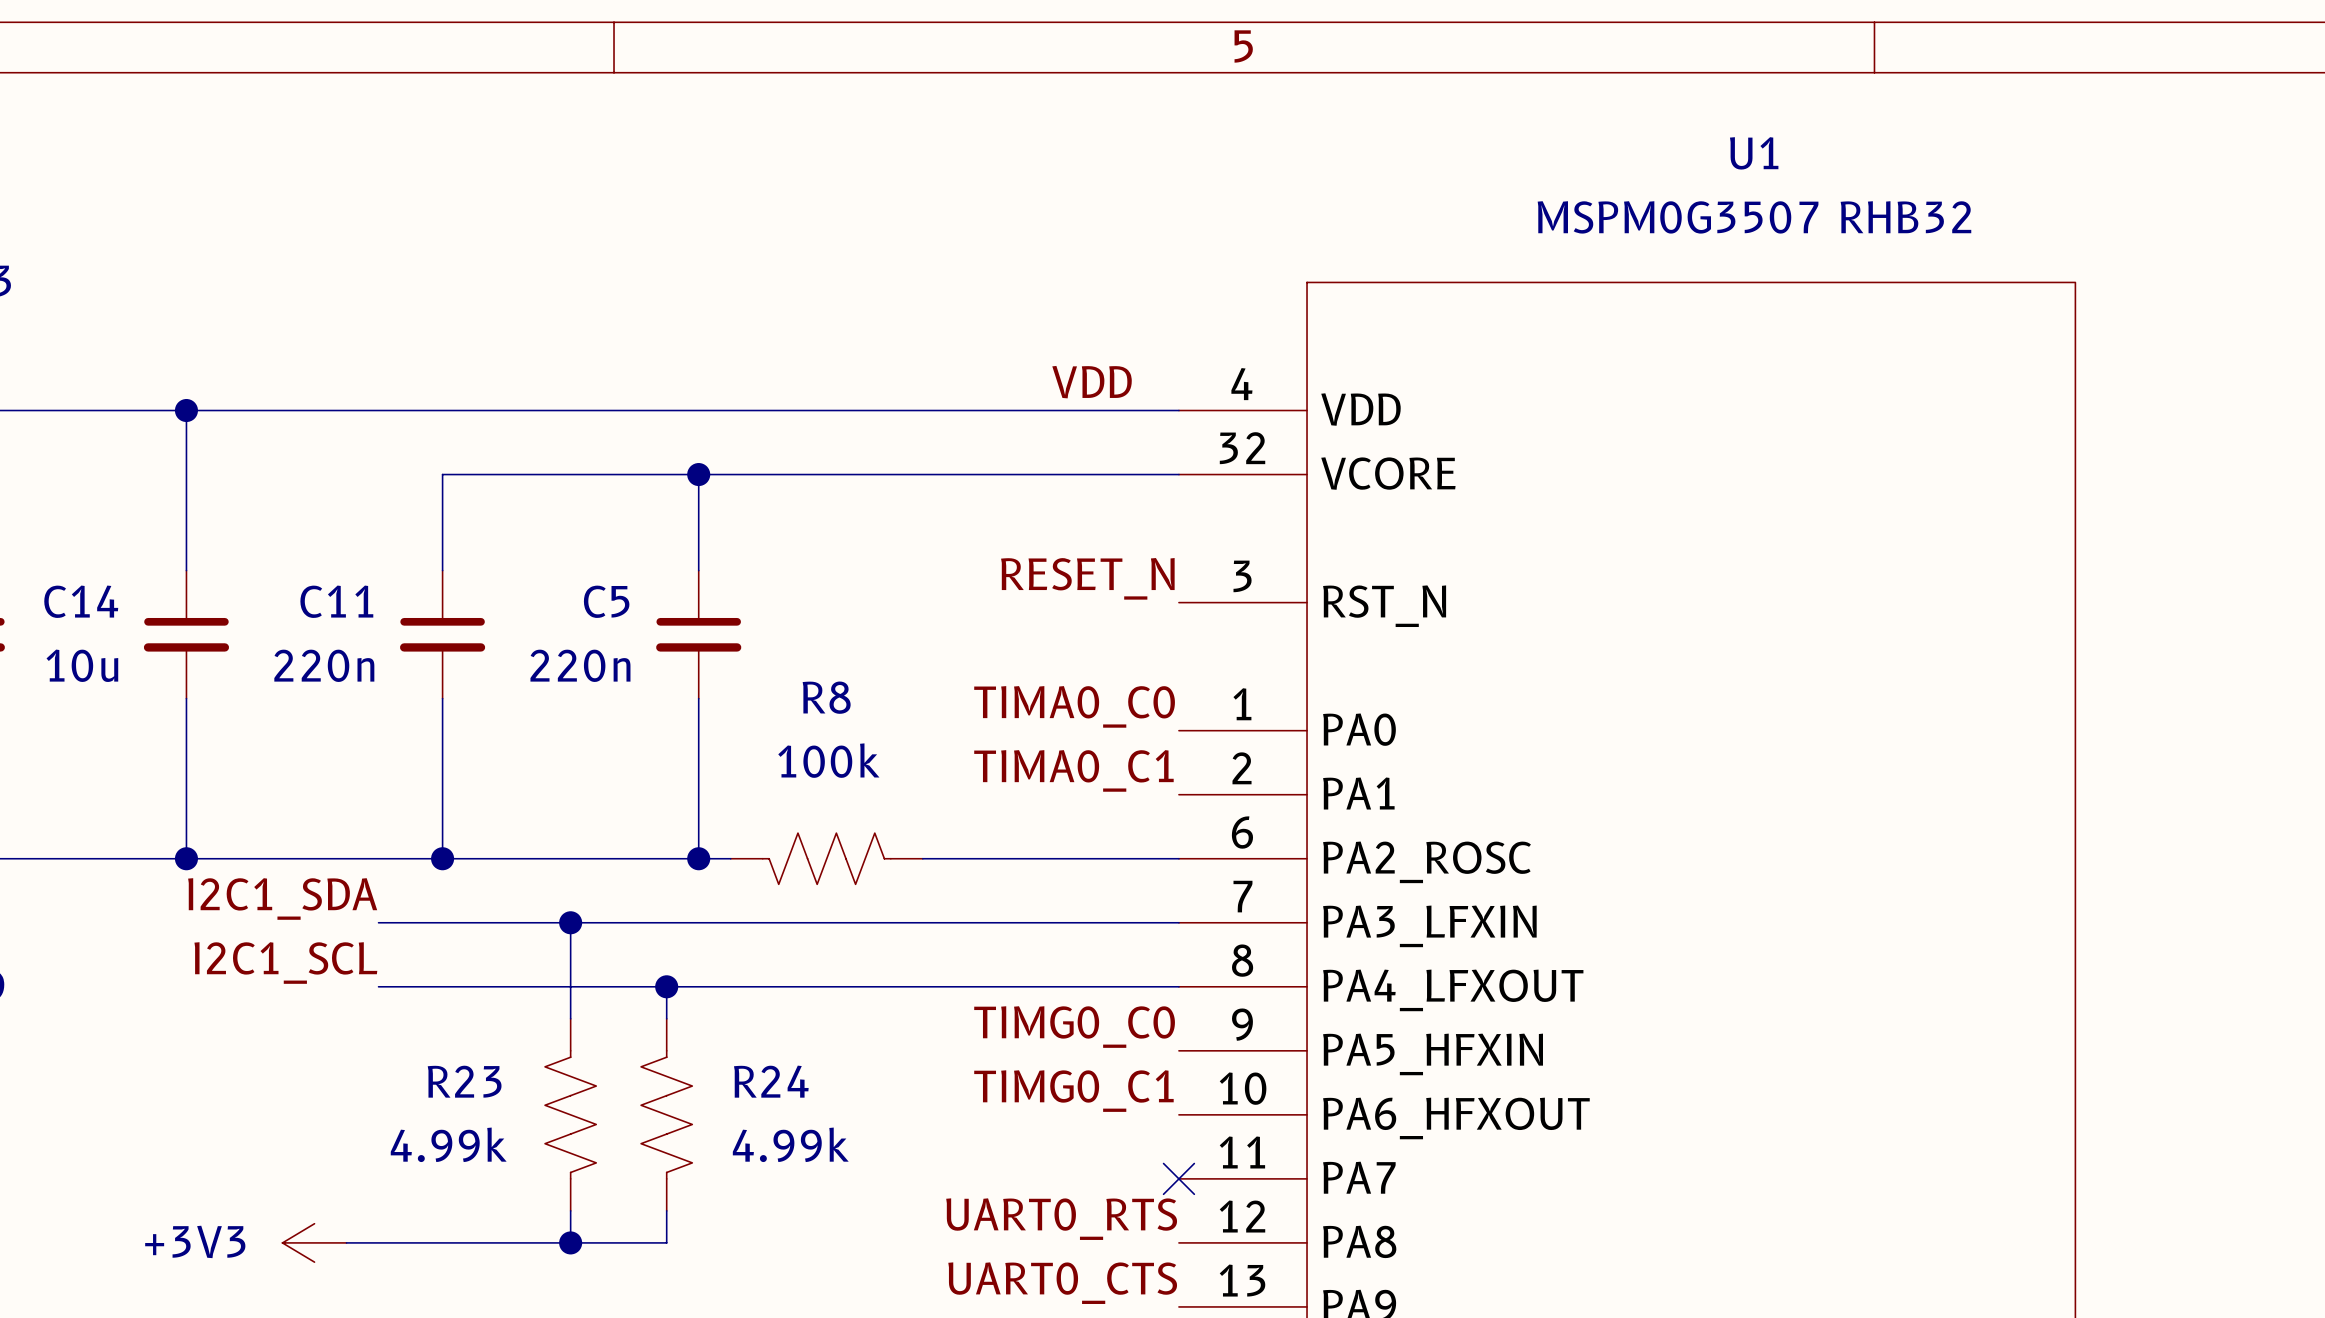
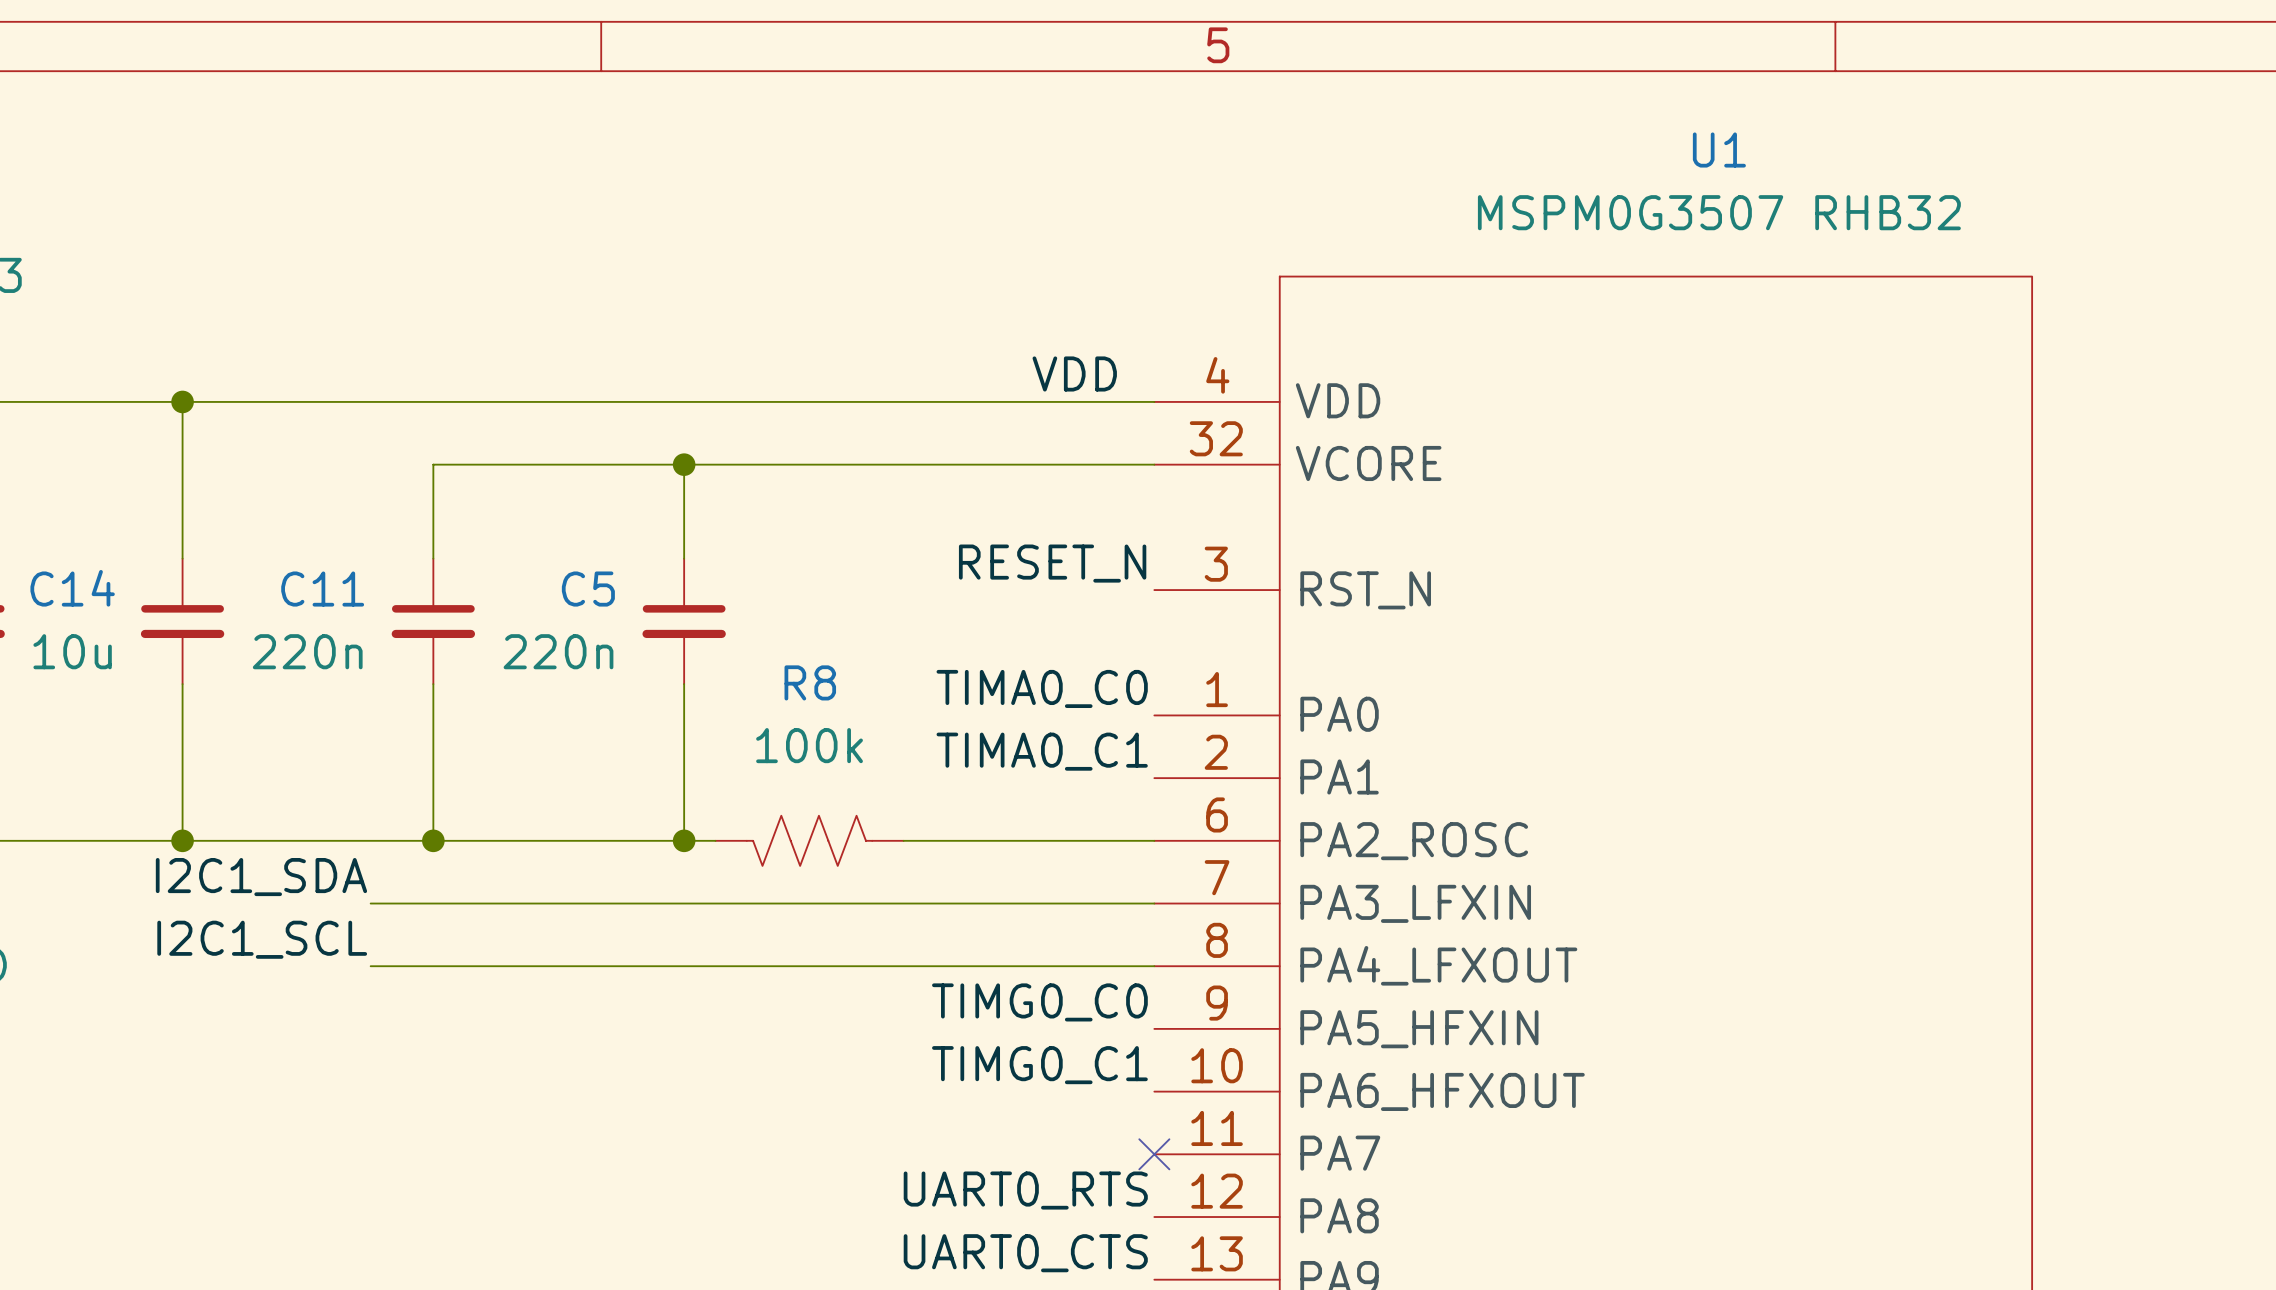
wire: (570, 922) (570, 1018) -> none
junction: (570, 922) -> none
wire: (666, 986) (666, 1018) -> none
junction: (666, 986) -> none
R23: 4.99k (570, 1114) -> none
R24: 4.99k (666, 1114) -> none
wire: (570, 1210) (570, 1242) -> none
wire: (666, 1210) (666, 1242) (346, 1242) -> none
power symbol: +3V3 (314, 1242) -> none
junction: (570, 1242) -> none

